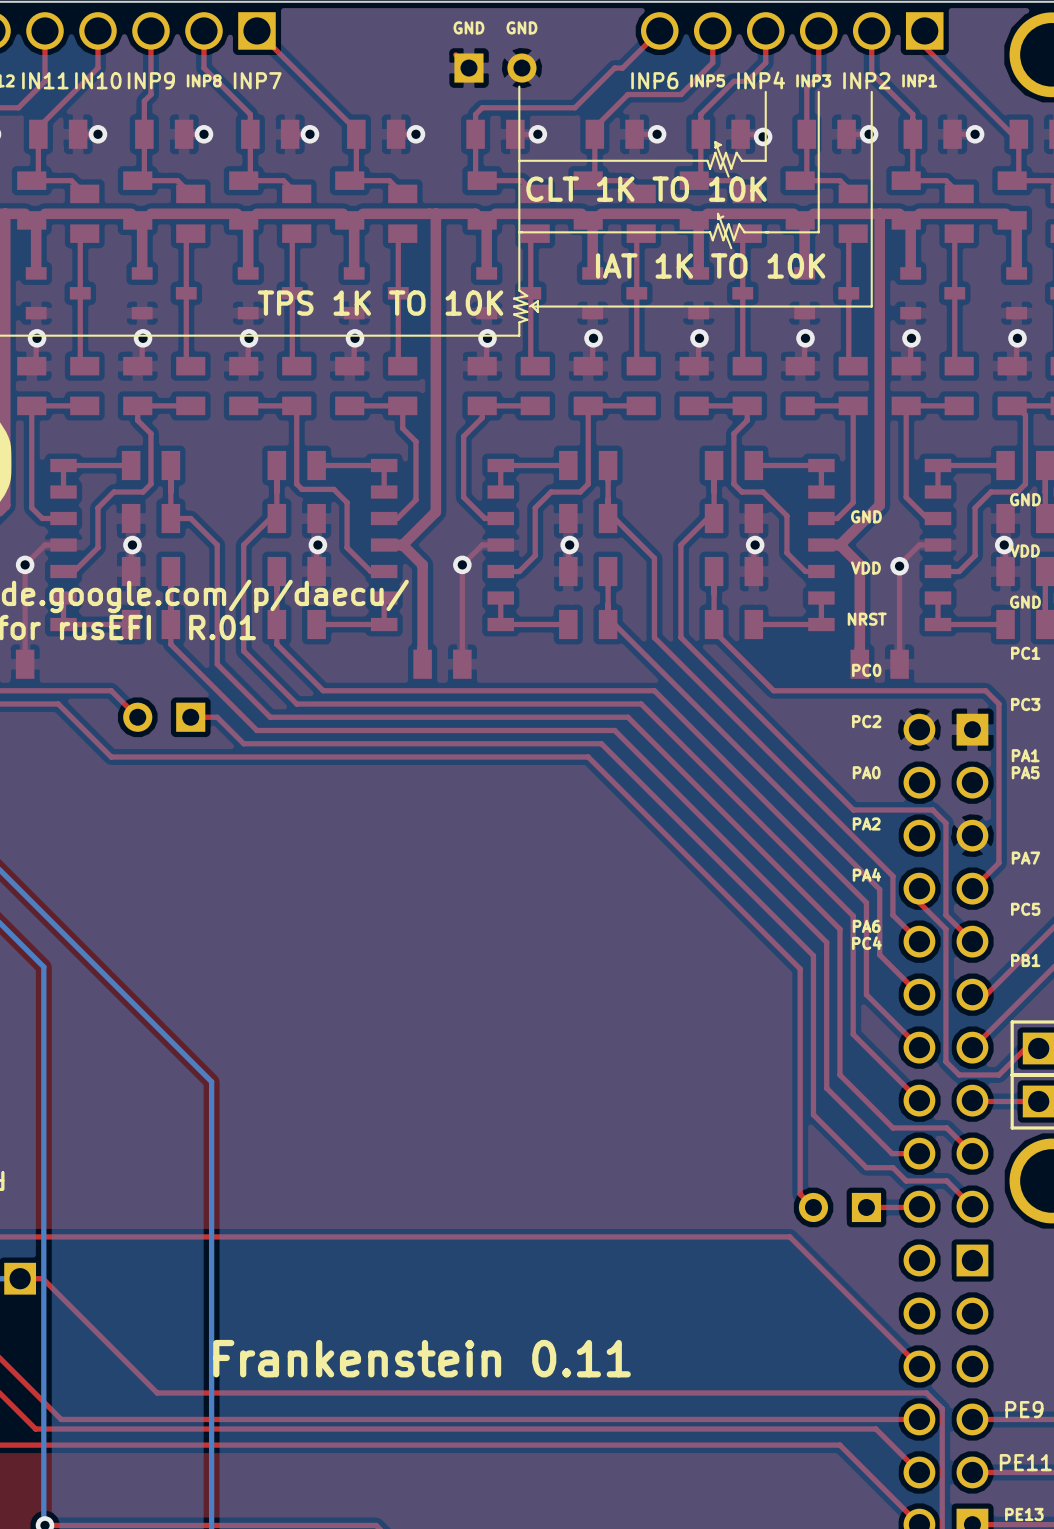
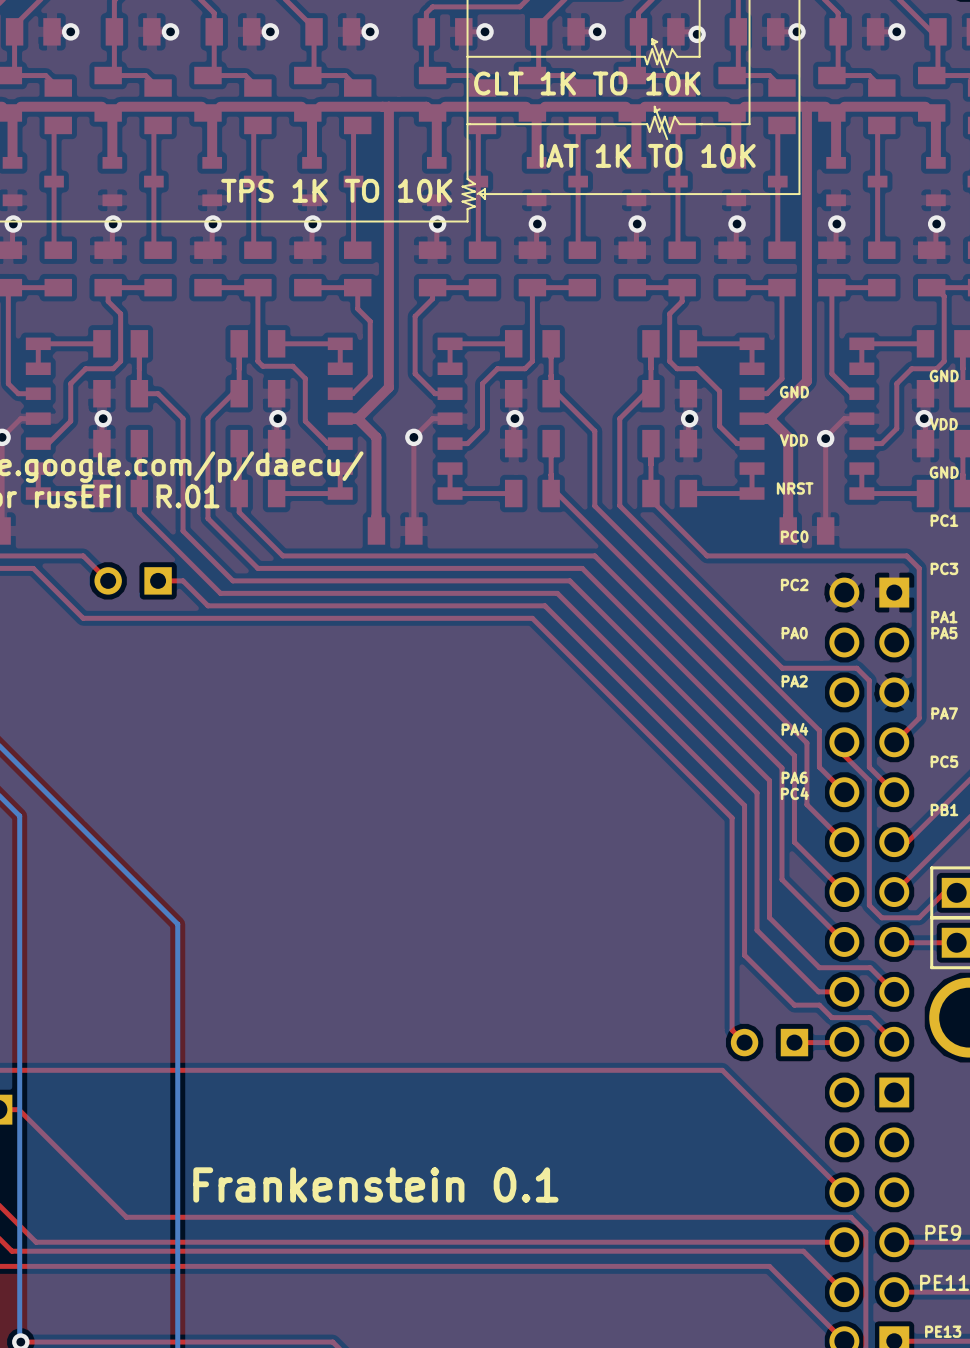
text: Frankenstein 0.11 (422, 1358) -> Frankenstein 0.1 (375, 1184)

